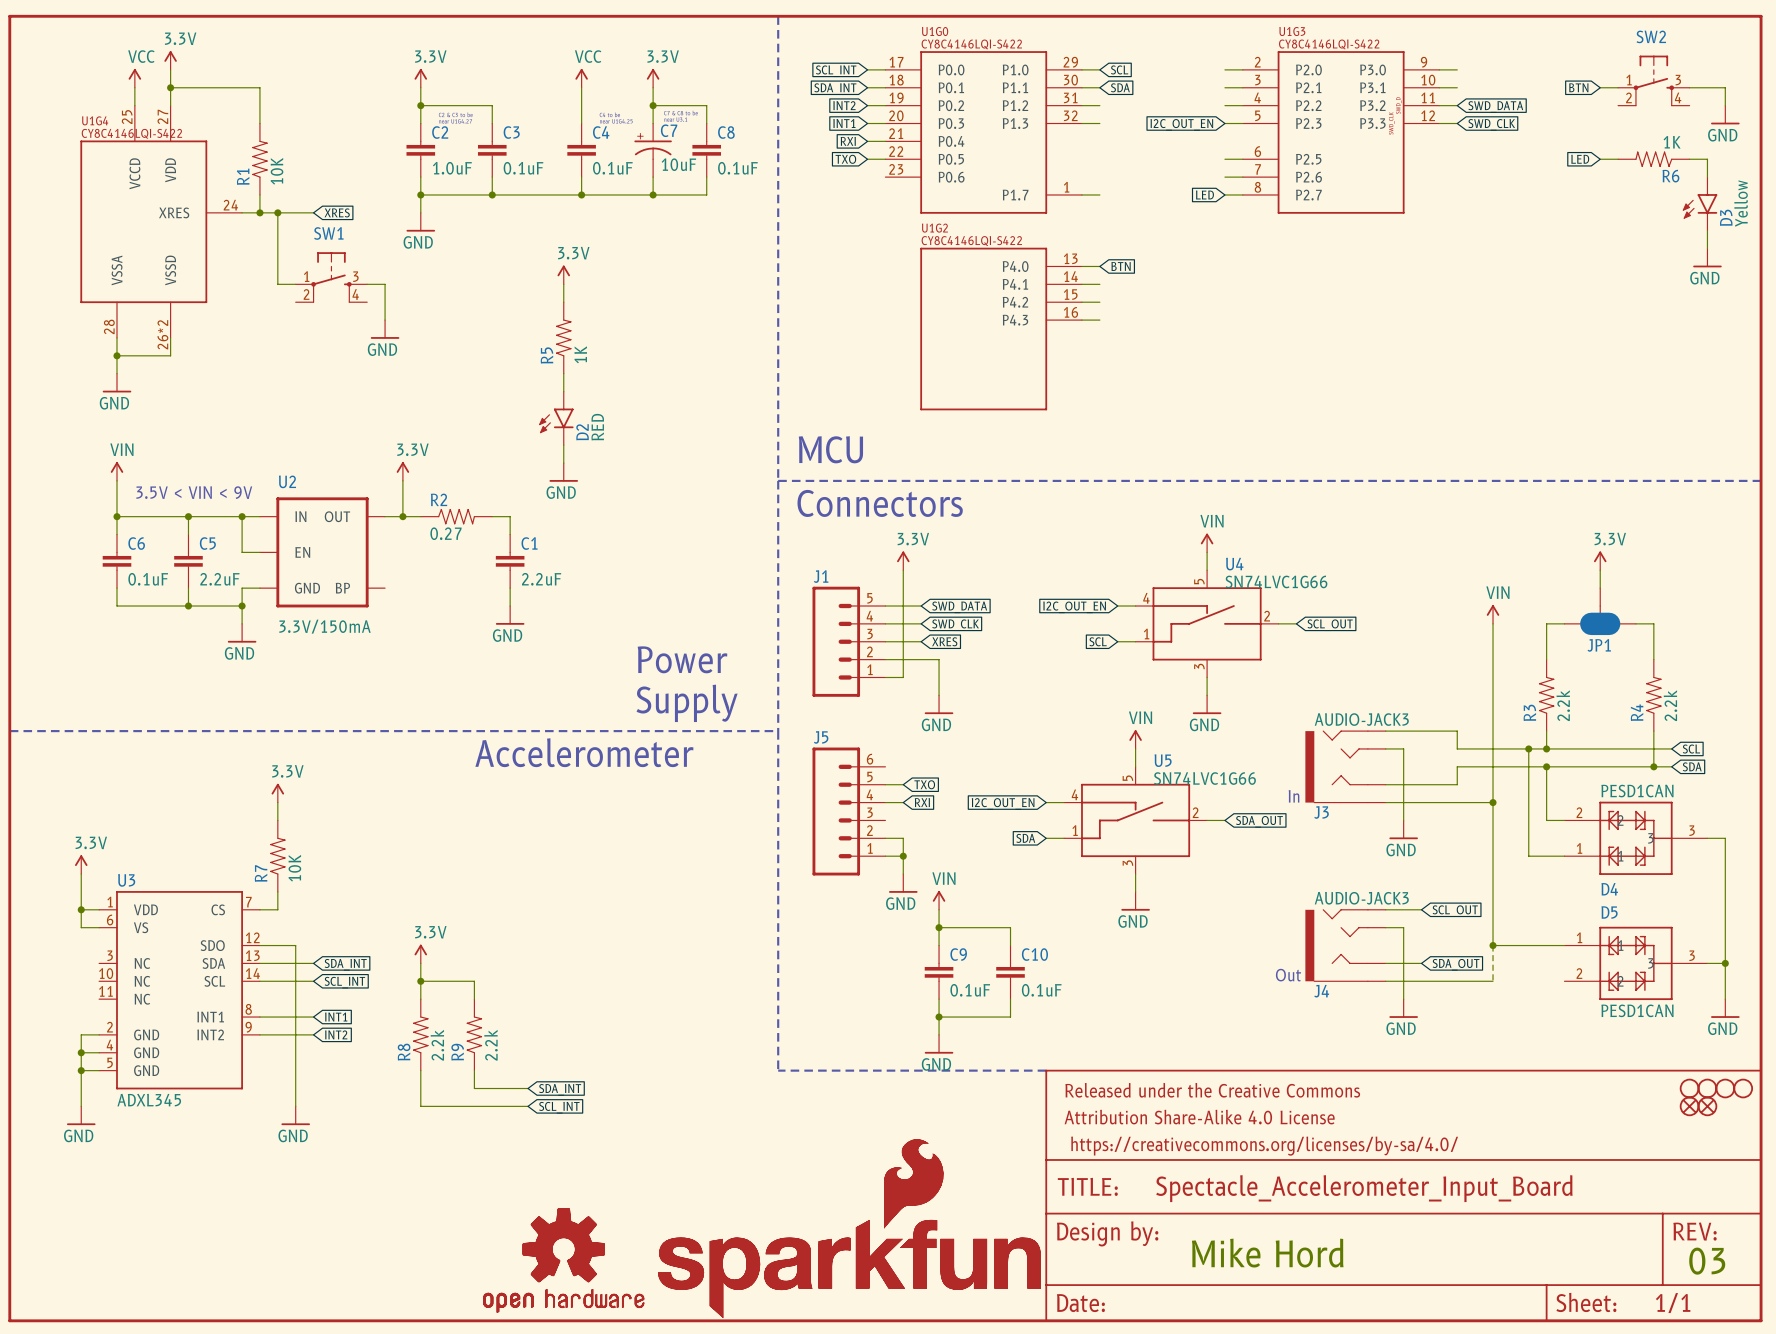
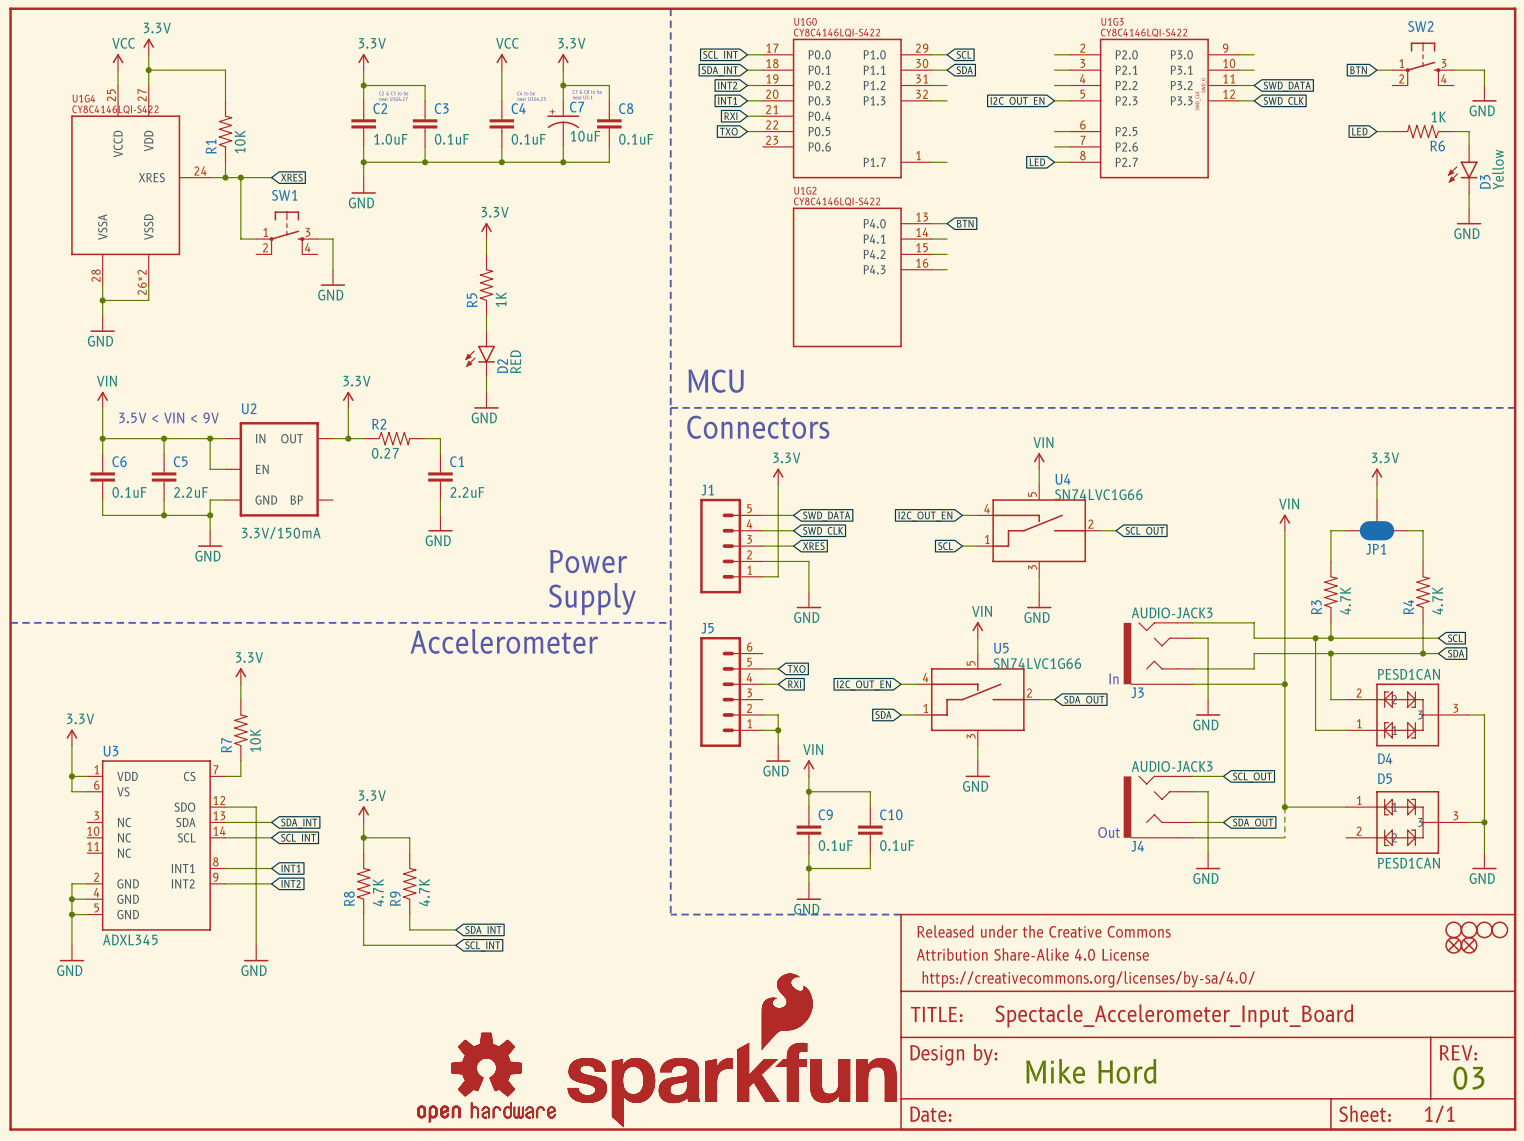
R3 value: 2.2k (1563, 705) -> 4.7K (1345, 600)
R4 value: 2.2k (1670, 705) -> 4.7K (1437, 600)
R8 value: 2.2k (437, 1045) -> 4.7K (378, 892)
R9 value: 2.2k (491, 1045) -> 4.7K (424, 892)

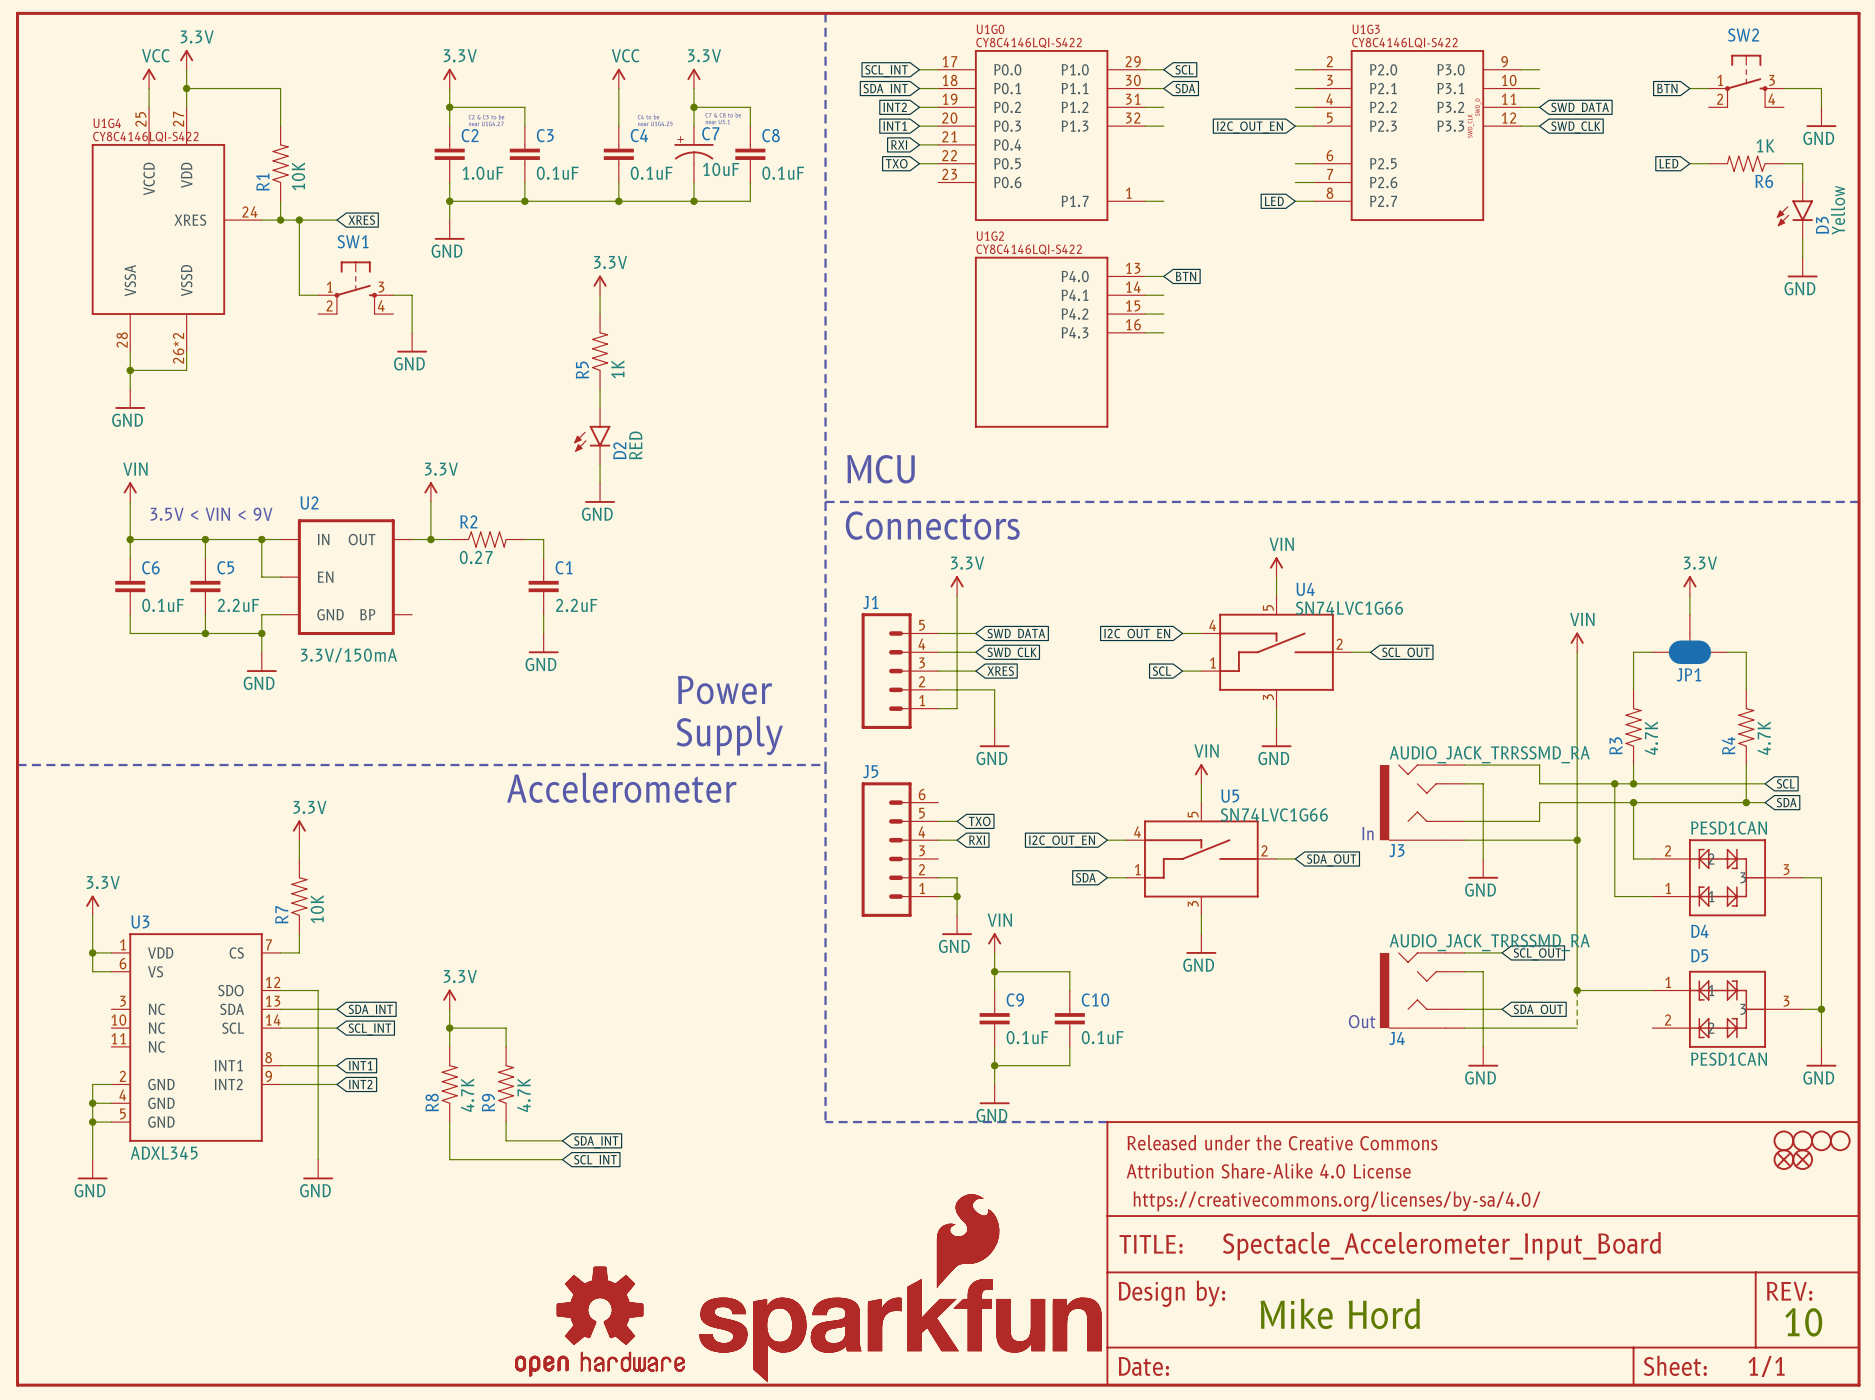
J3 value: AUDIO-JACK3 (1172, 612) -> AUDIO_JACK_TRRSSMD_RA (1489, 754)
J4 value: AUDIO-JACK3 (1172, 766) -> AUDIO_JACK_TRRSSMD_RA (1489, 942)
text: 03 (1468, 1078) -> 10 (1803, 1322)

